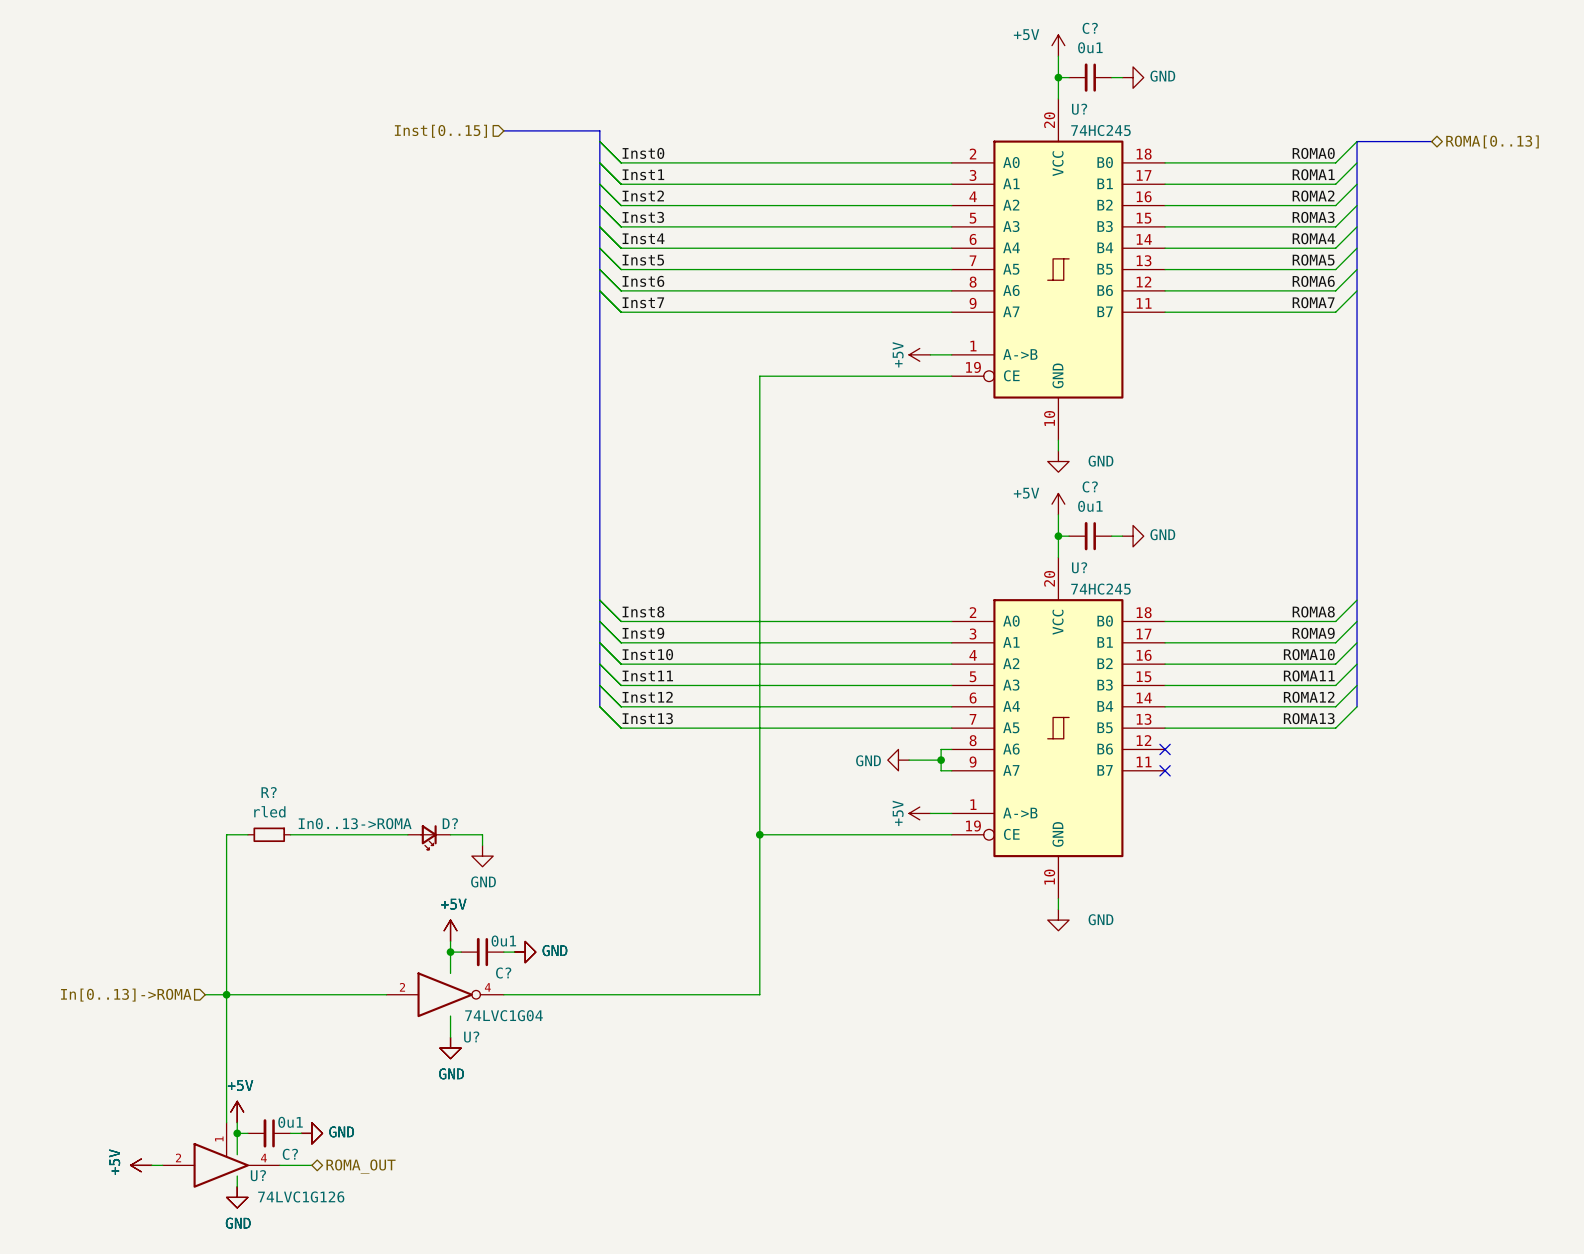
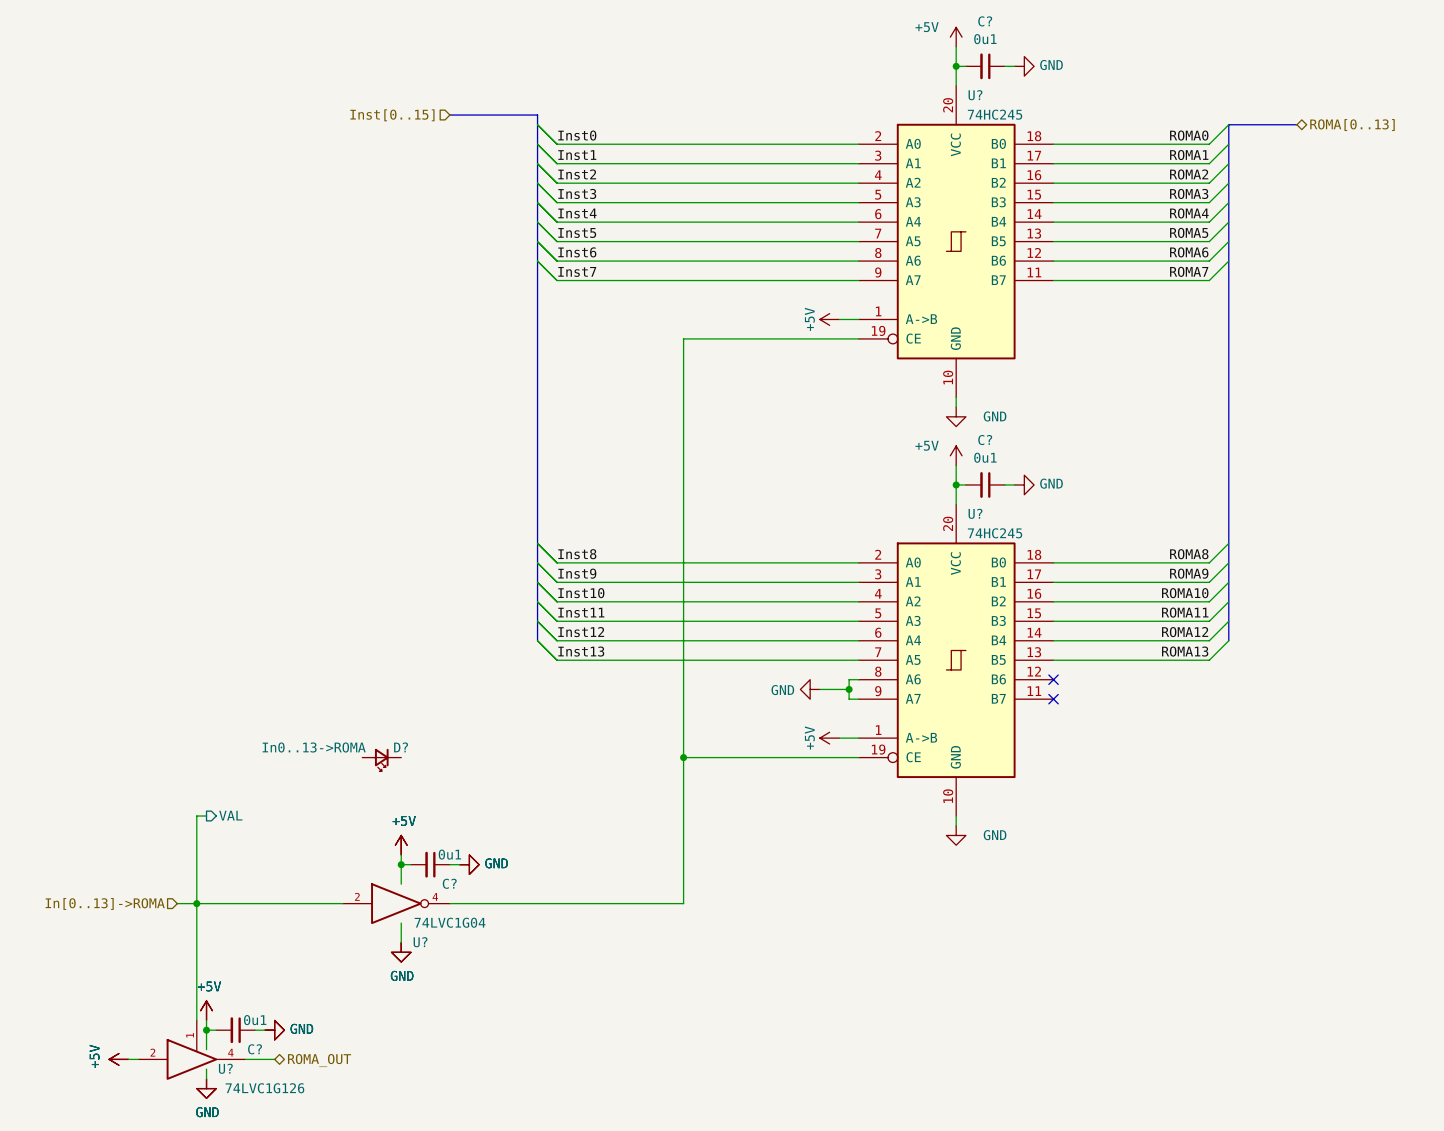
wire: (247, 834) (226, 834) (226, 898) -> (206, 816) (196, 816)
R?: rled (269, 834) -> none
wire: (290, 834) (407, 834) -> none
wire: (450, 834) (482, 834) (482, 845) -> none
power symbol: GND (482, 856) -> none
sheet pin: none -> VAL (230, 815)

